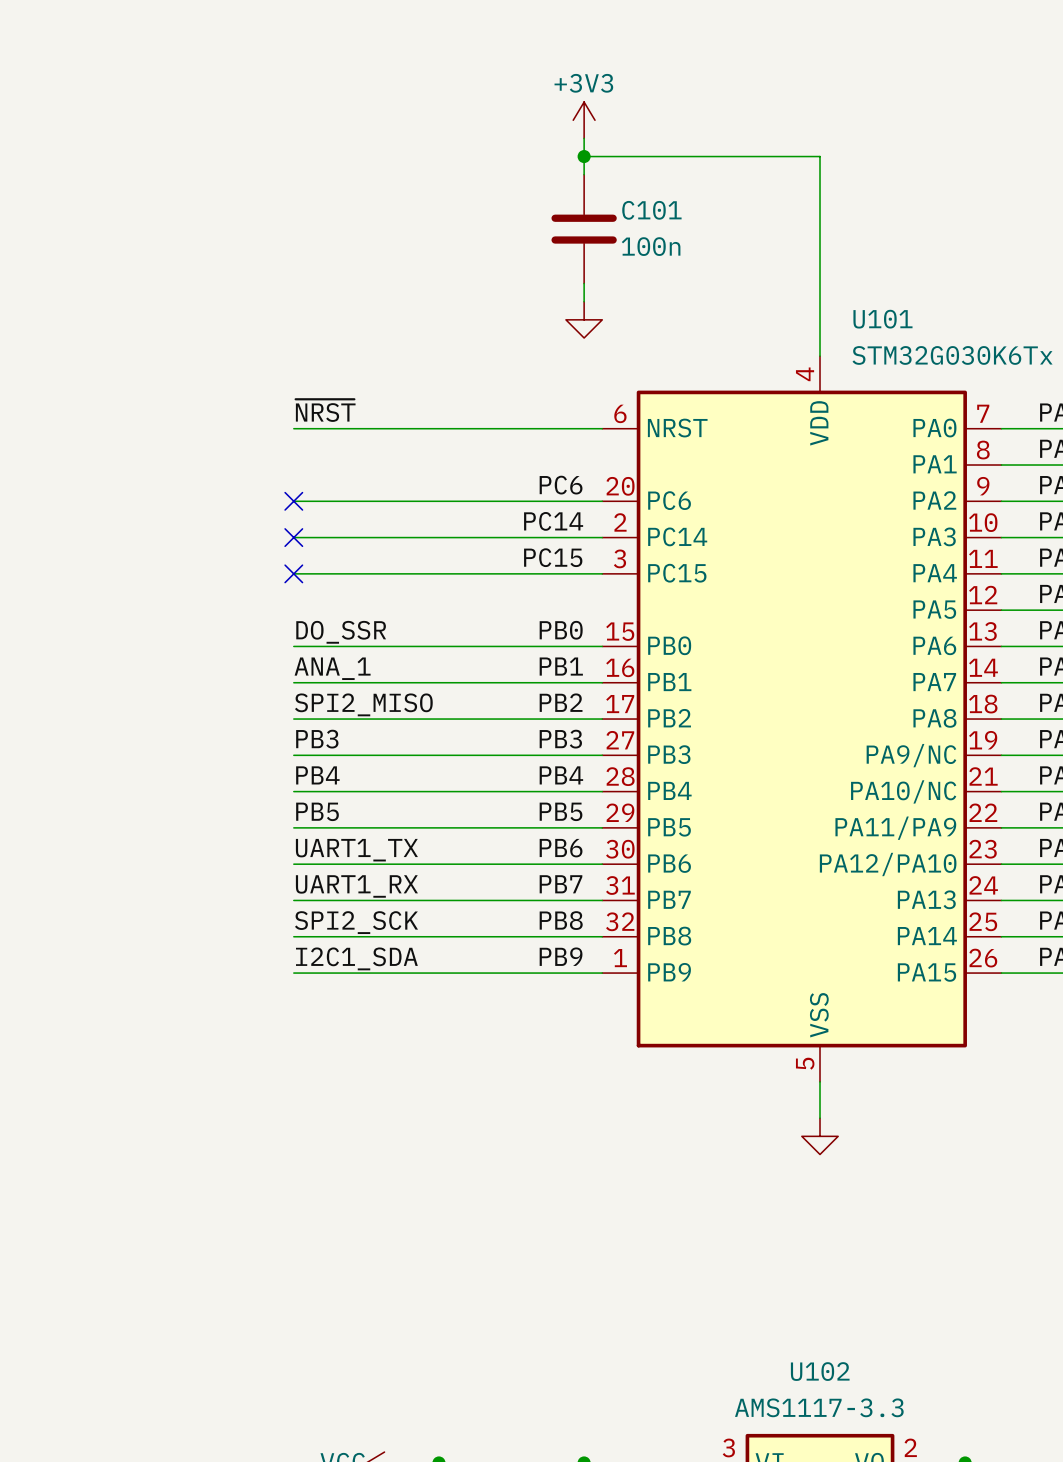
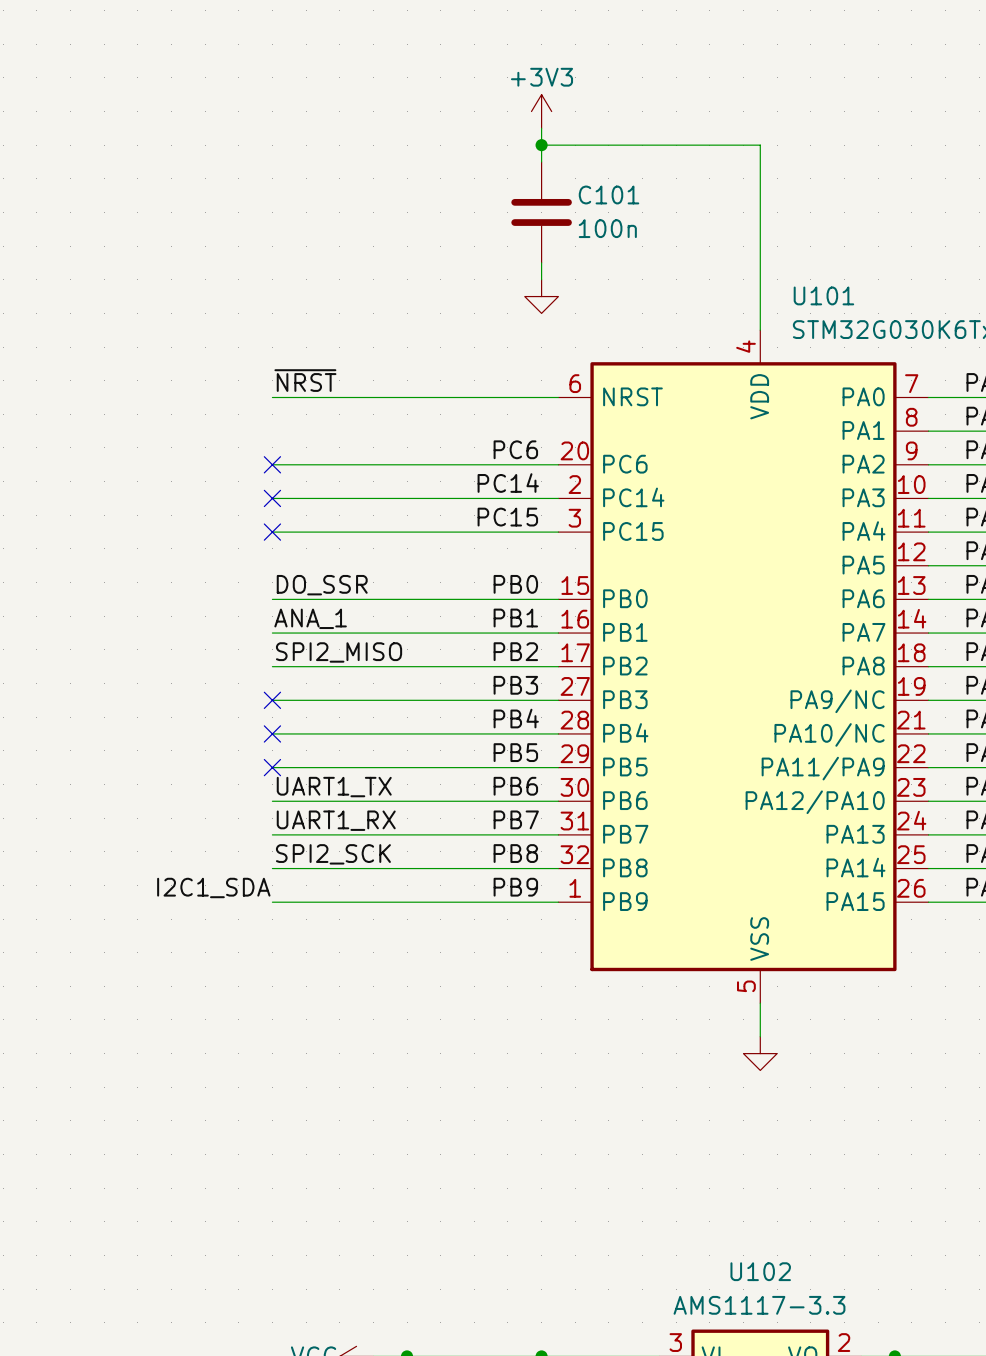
label: PB3 (317, 739) -> none
no-connect mark: none -> (272, 700)
label: PB4 (317, 775) -> none
no-connect mark: none -> (272, 733)
label: PB5 (317, 811) -> none
no-connect mark: none -> (272, 767)
label position: I2C1_SDA (356, 958) -> I2C1_SDA (213, 887)

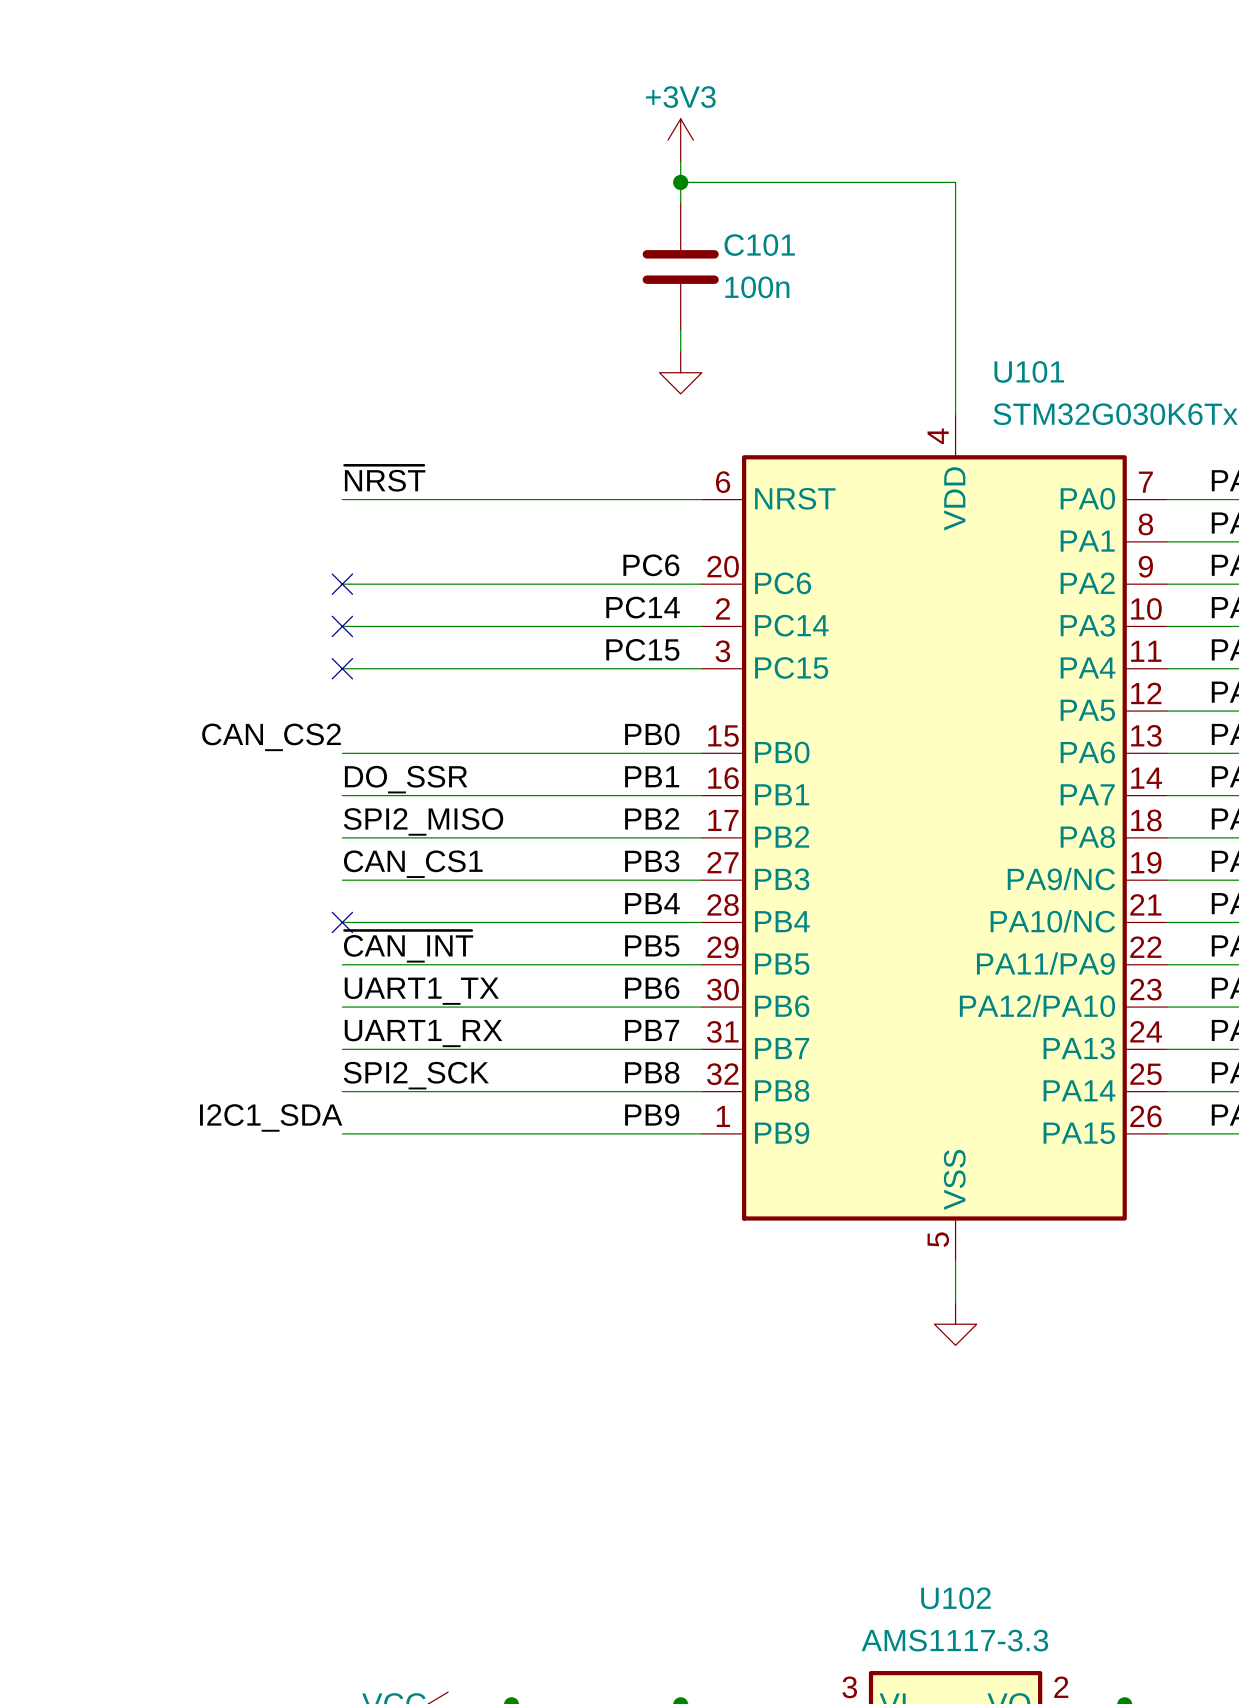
label: DO_SSR (322, 585) -> CAN_CS2 (271, 737)
label: ANA_1 (310, 618) -> DO_SSR (406, 779)
label: none -> CAN_CS1 (413, 864)
no-connect mark: (272, 700) -> none
label: none -> ~{CAN_INT} (408, 946)
no-connect mark: (272, 767) -> none

